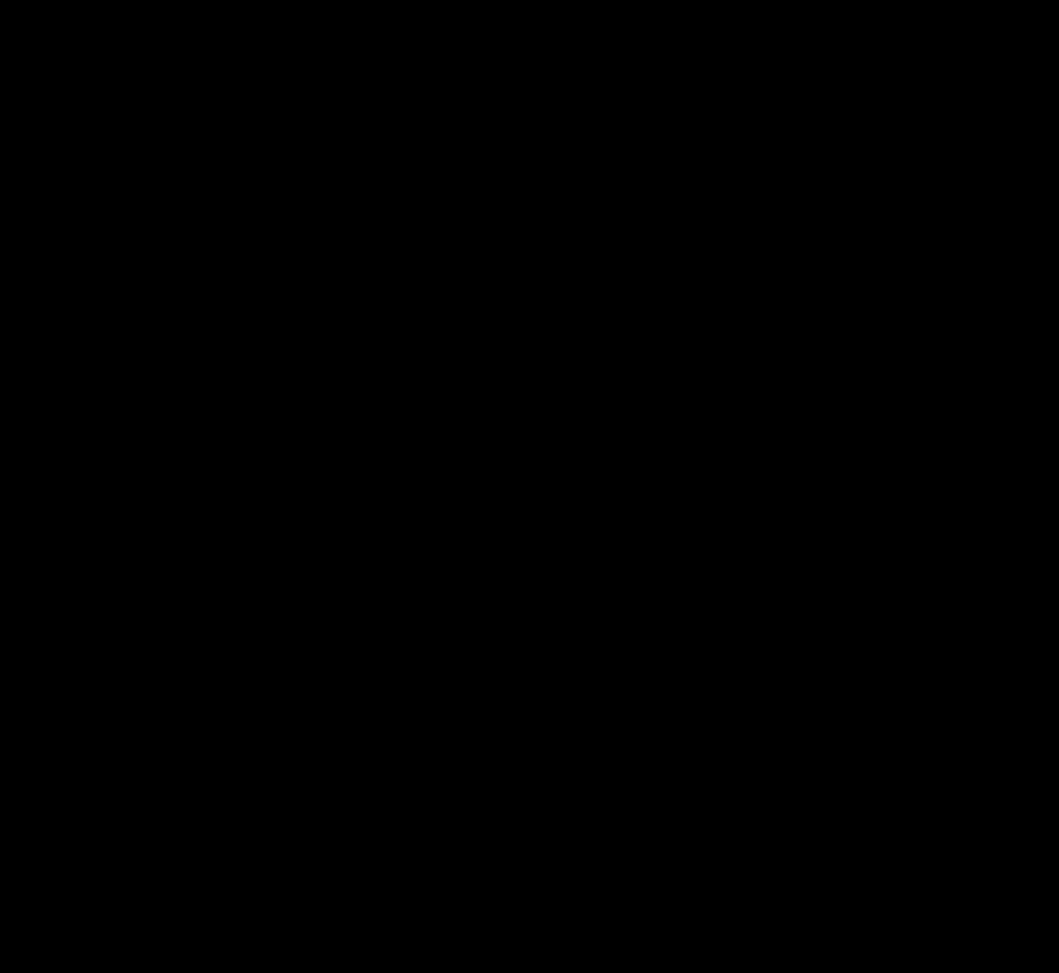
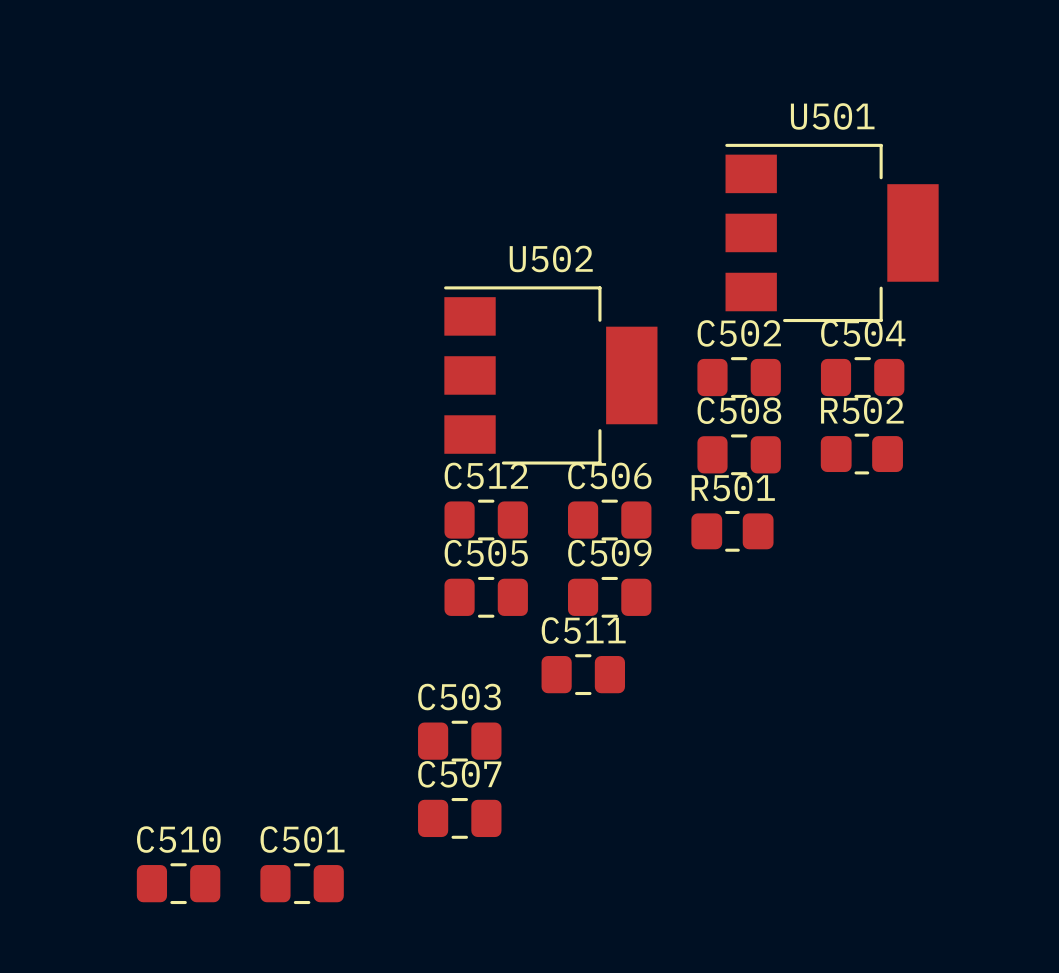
U501: none -> (831, 232)
U502: none -> (550, 375)
C502: none -> (739, 377)
C504: none -> (862, 377)
C508: none -> (739, 454)
R502: none -> (861, 454)
C512: none -> (486, 520)
C506: none -> (609, 520)
R501: none -> (732, 531)
C505: none -> (486, 597)
C509: none -> (609, 597)
C511: none -> (583, 674)
C503: none -> (459, 741)
C507: none -> (459, 818)
C510: none -> (178, 883)
C501: none -> (302, 883)

